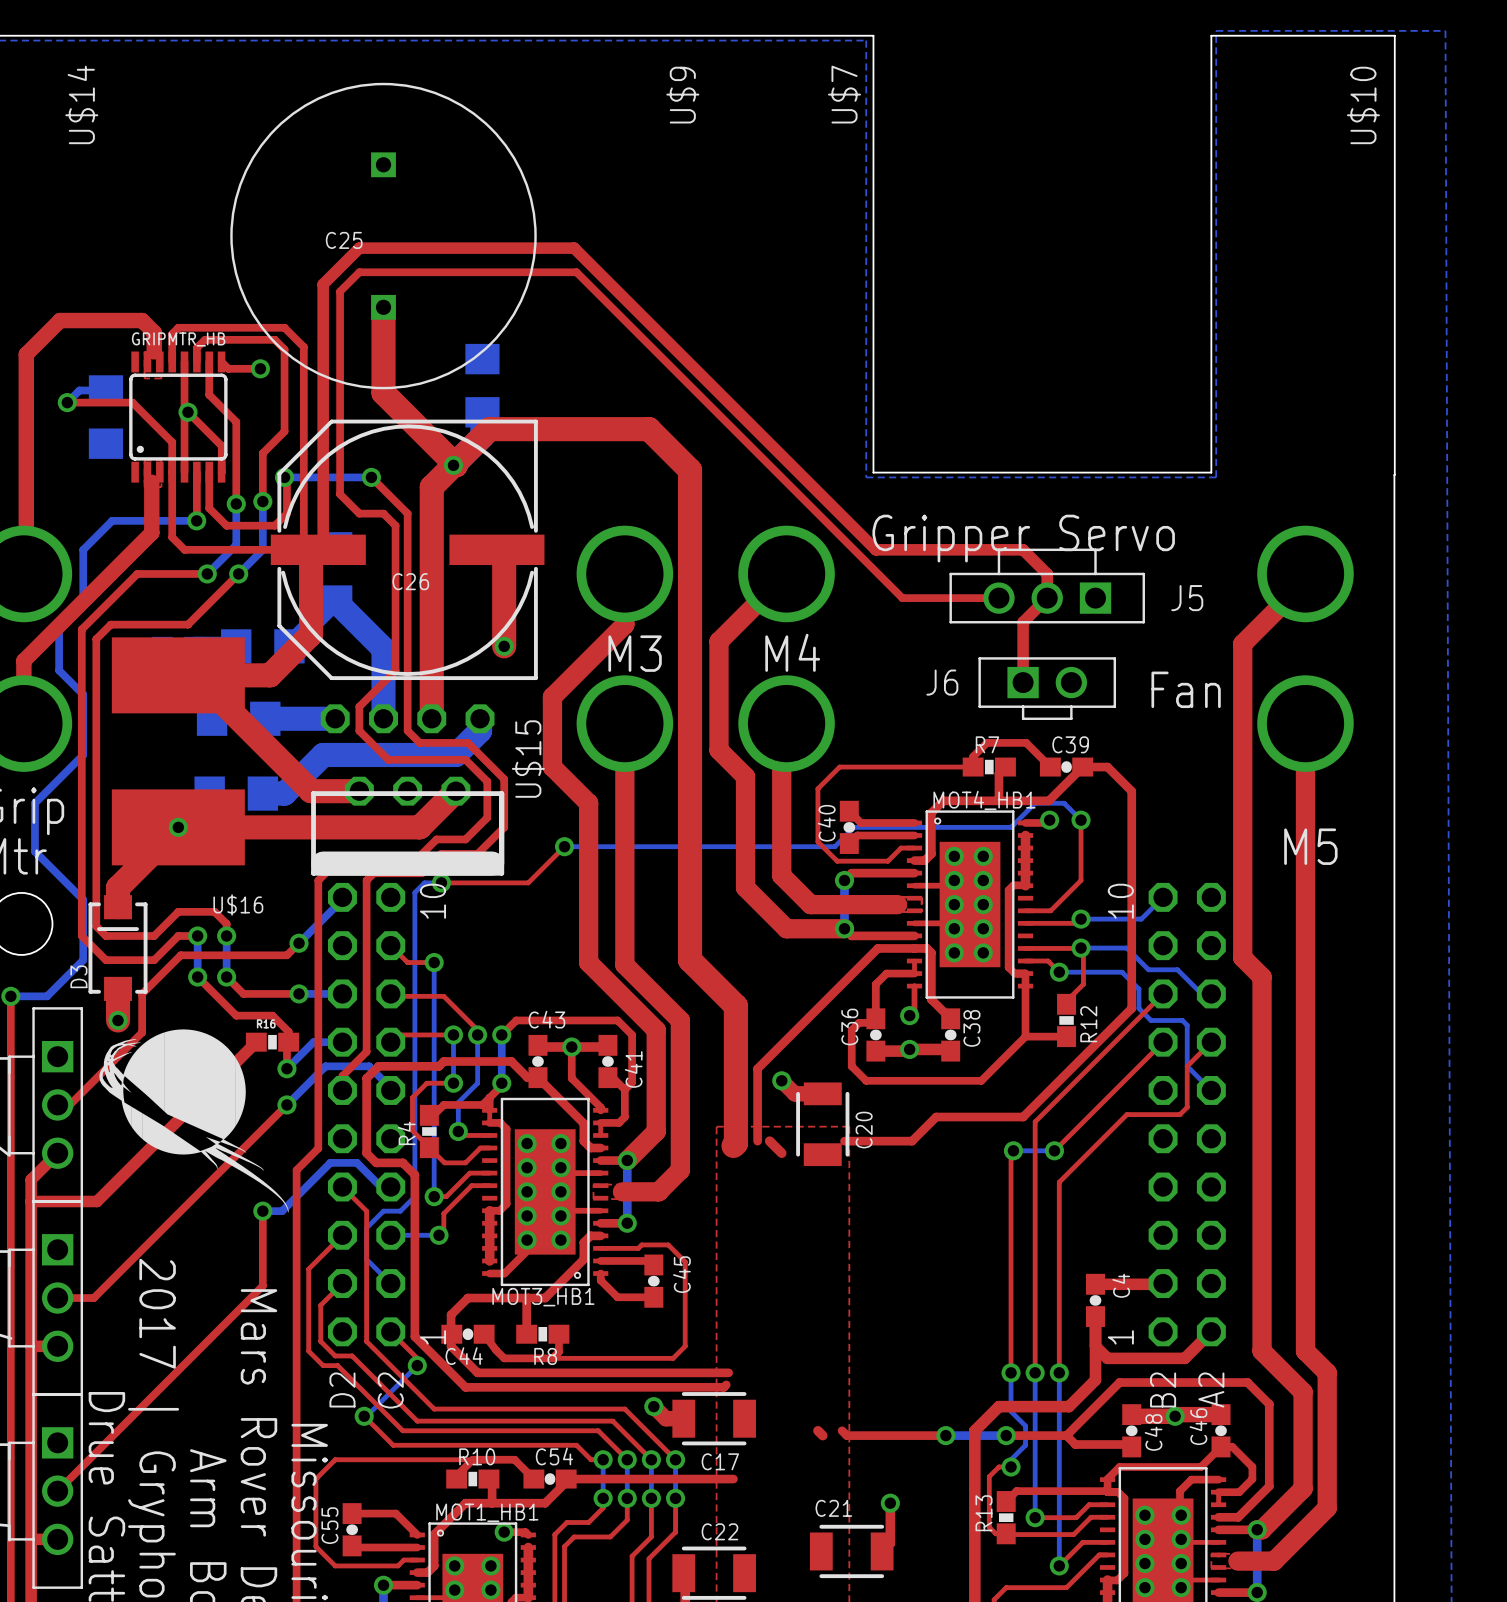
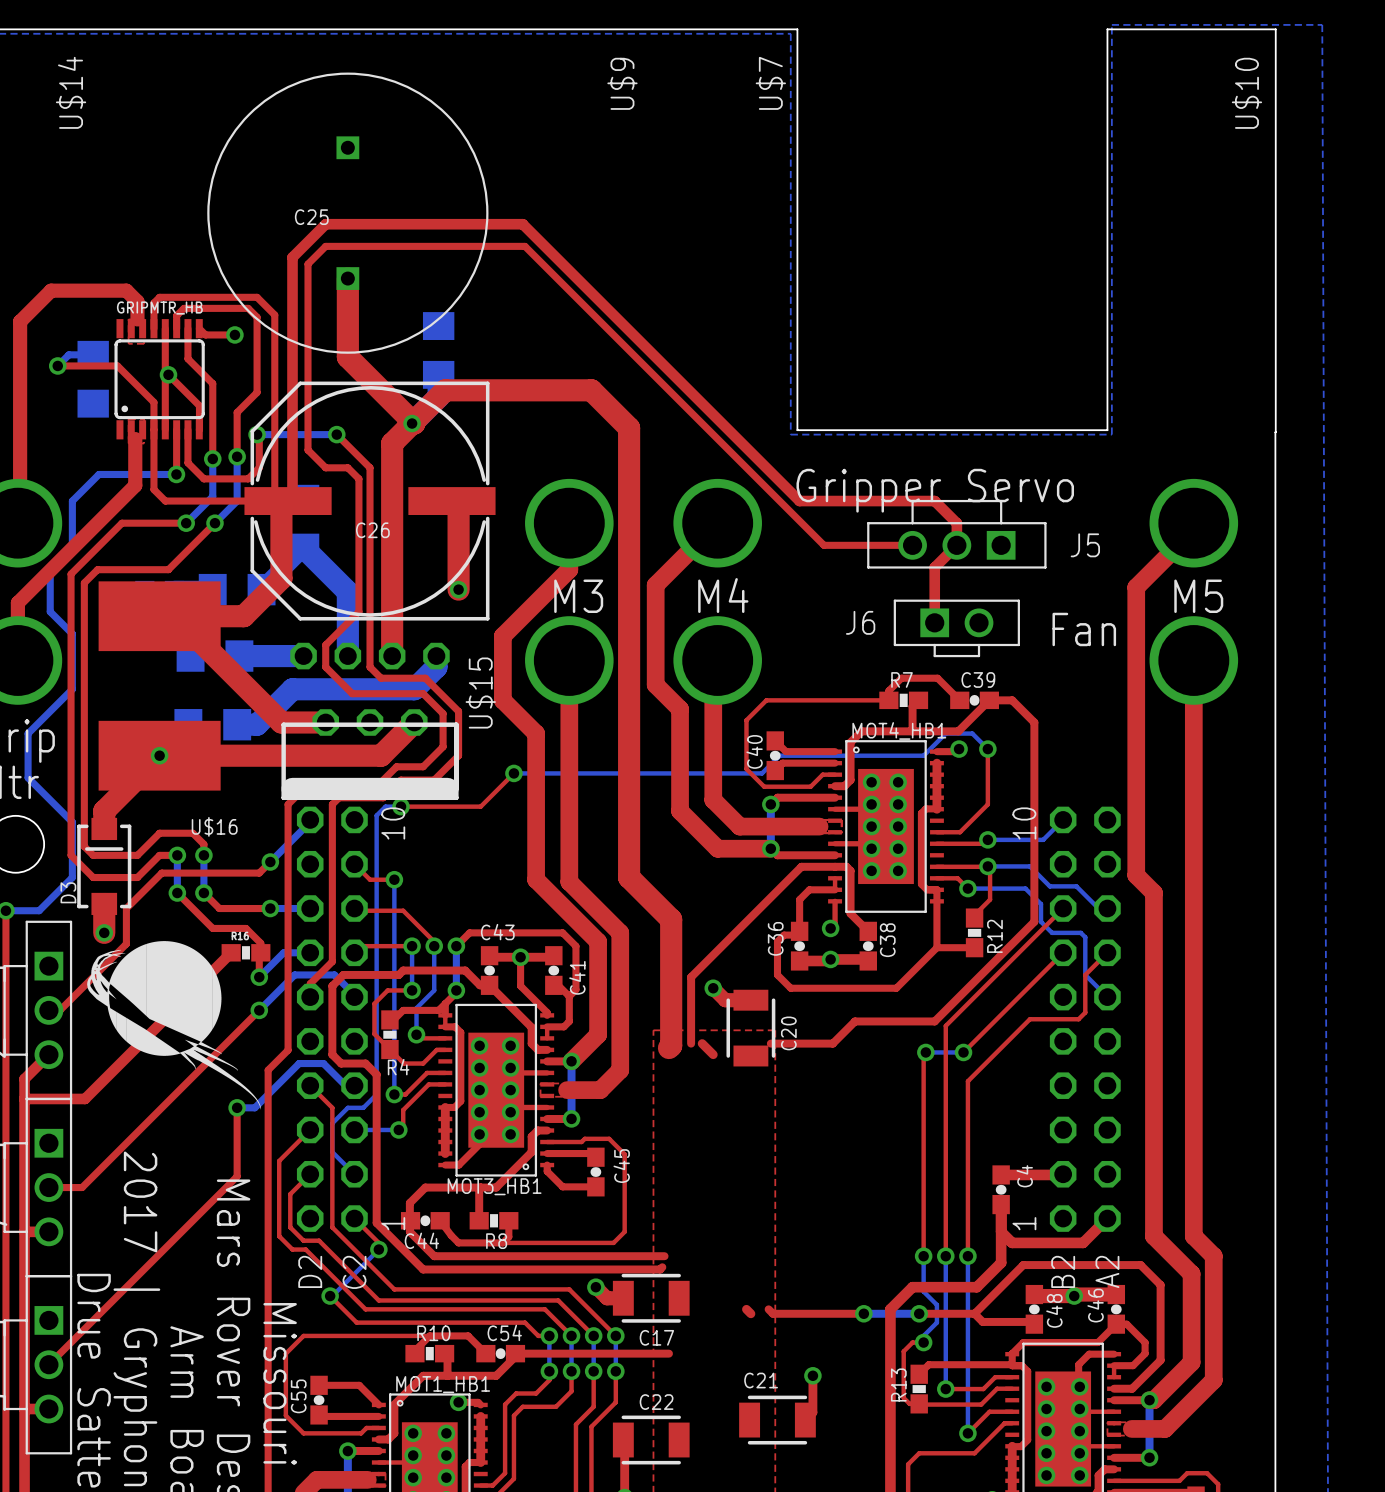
text position: M5 (1310, 846) -> M5 (1198, 596)
R4 name rotation: 0° (406, 1133) -> 90° clockwise (398, 1067)
R4 name position: R4 (406, 1133) -> R4 (398, 1067)

